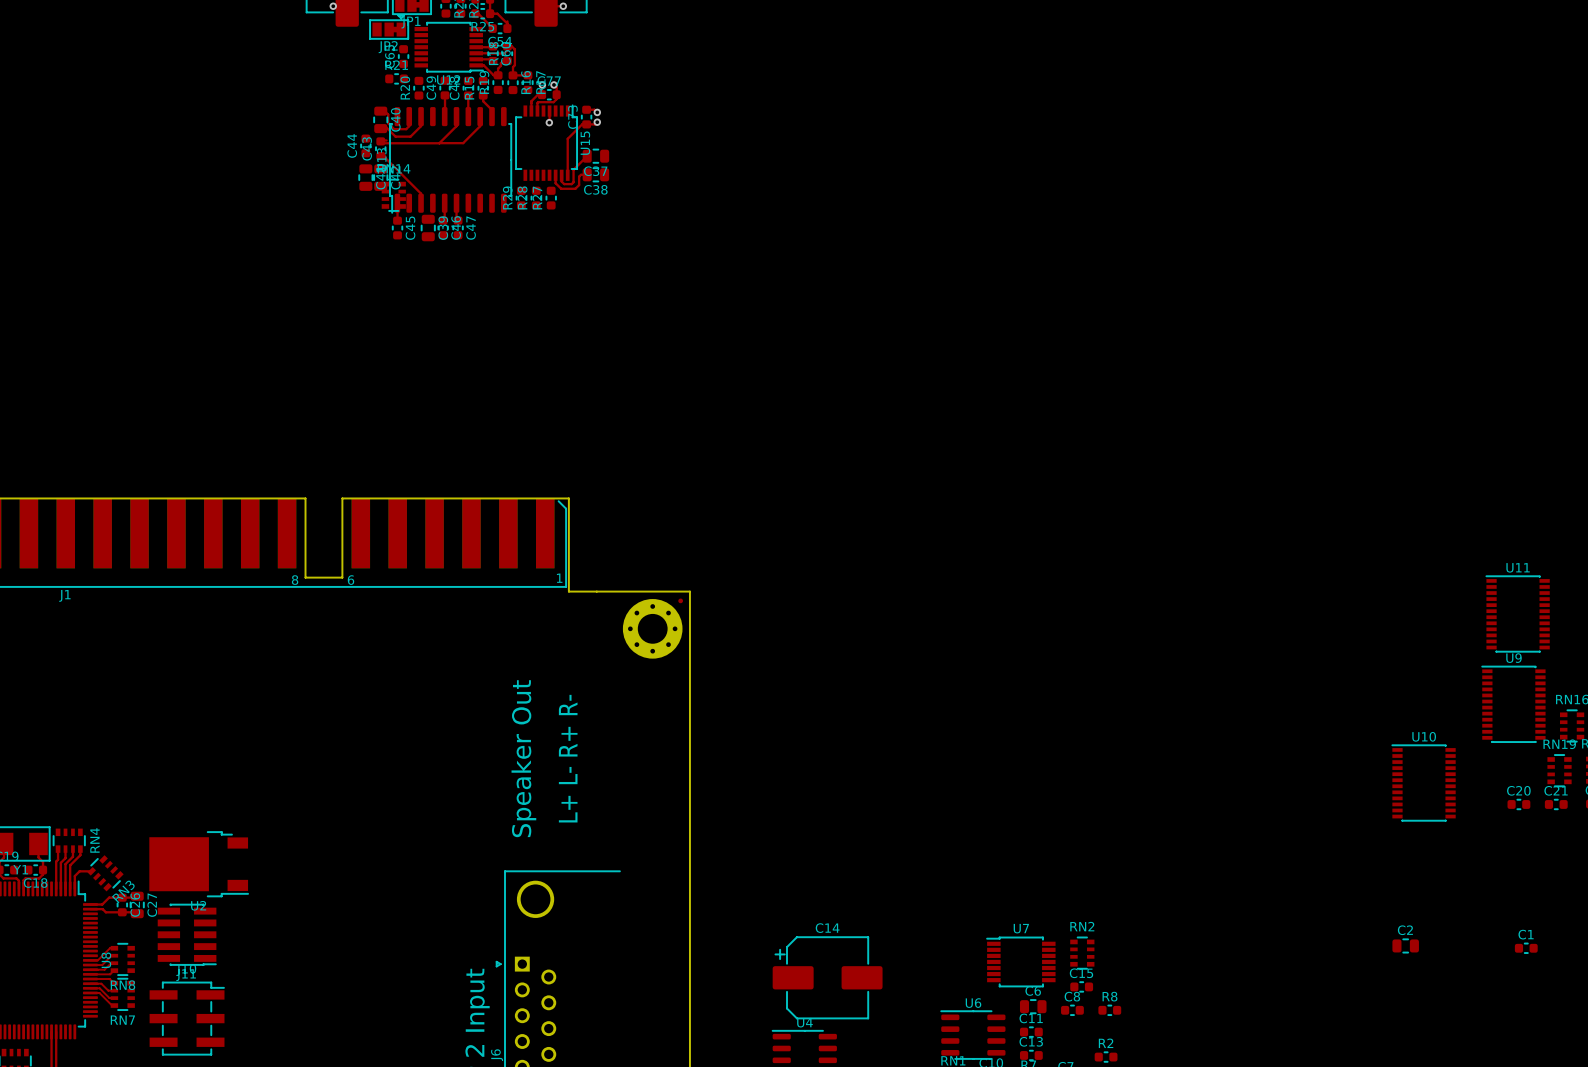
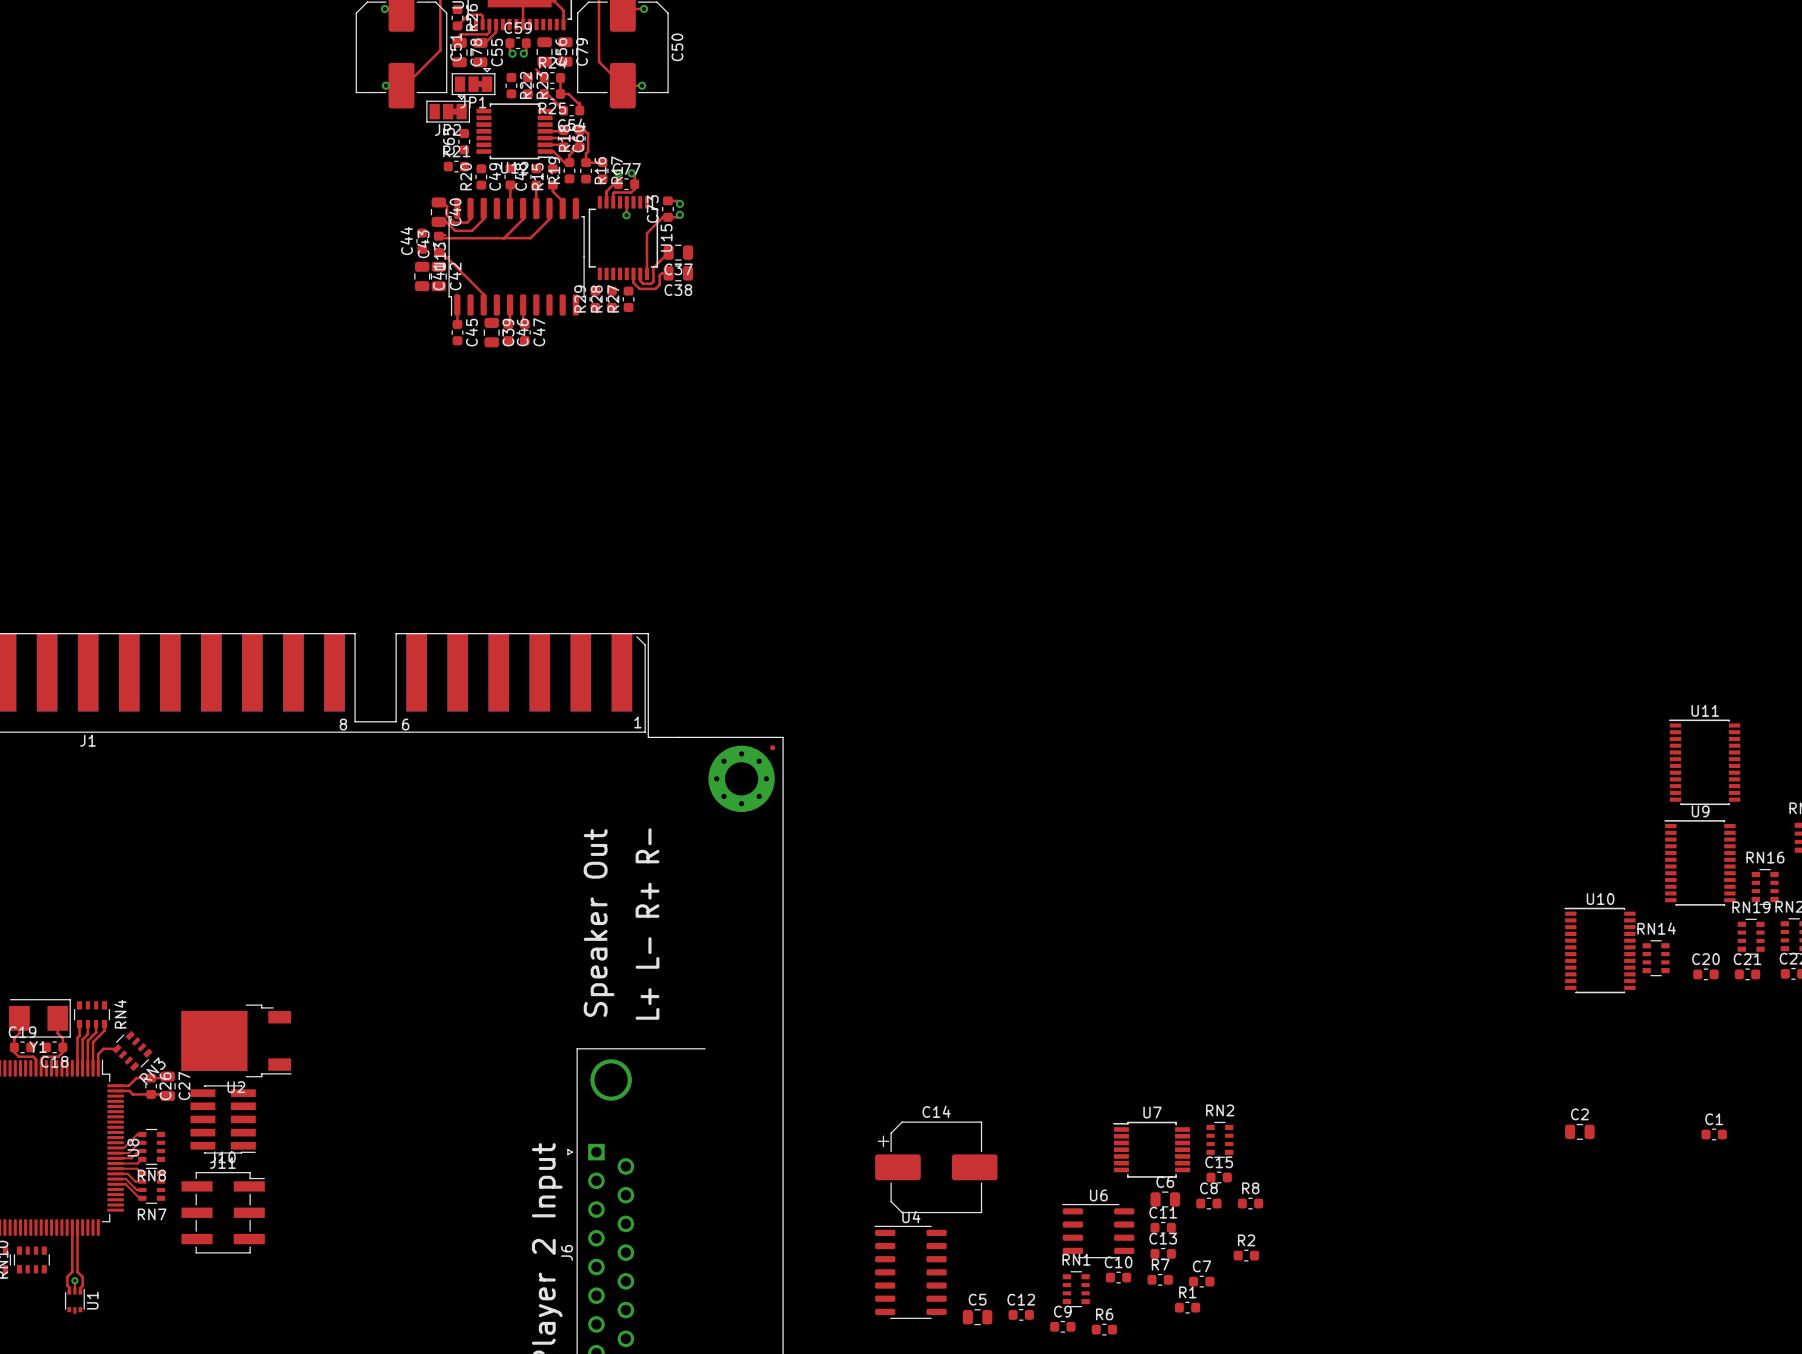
RN14 position: (393, 195) -> (1656, 958)

